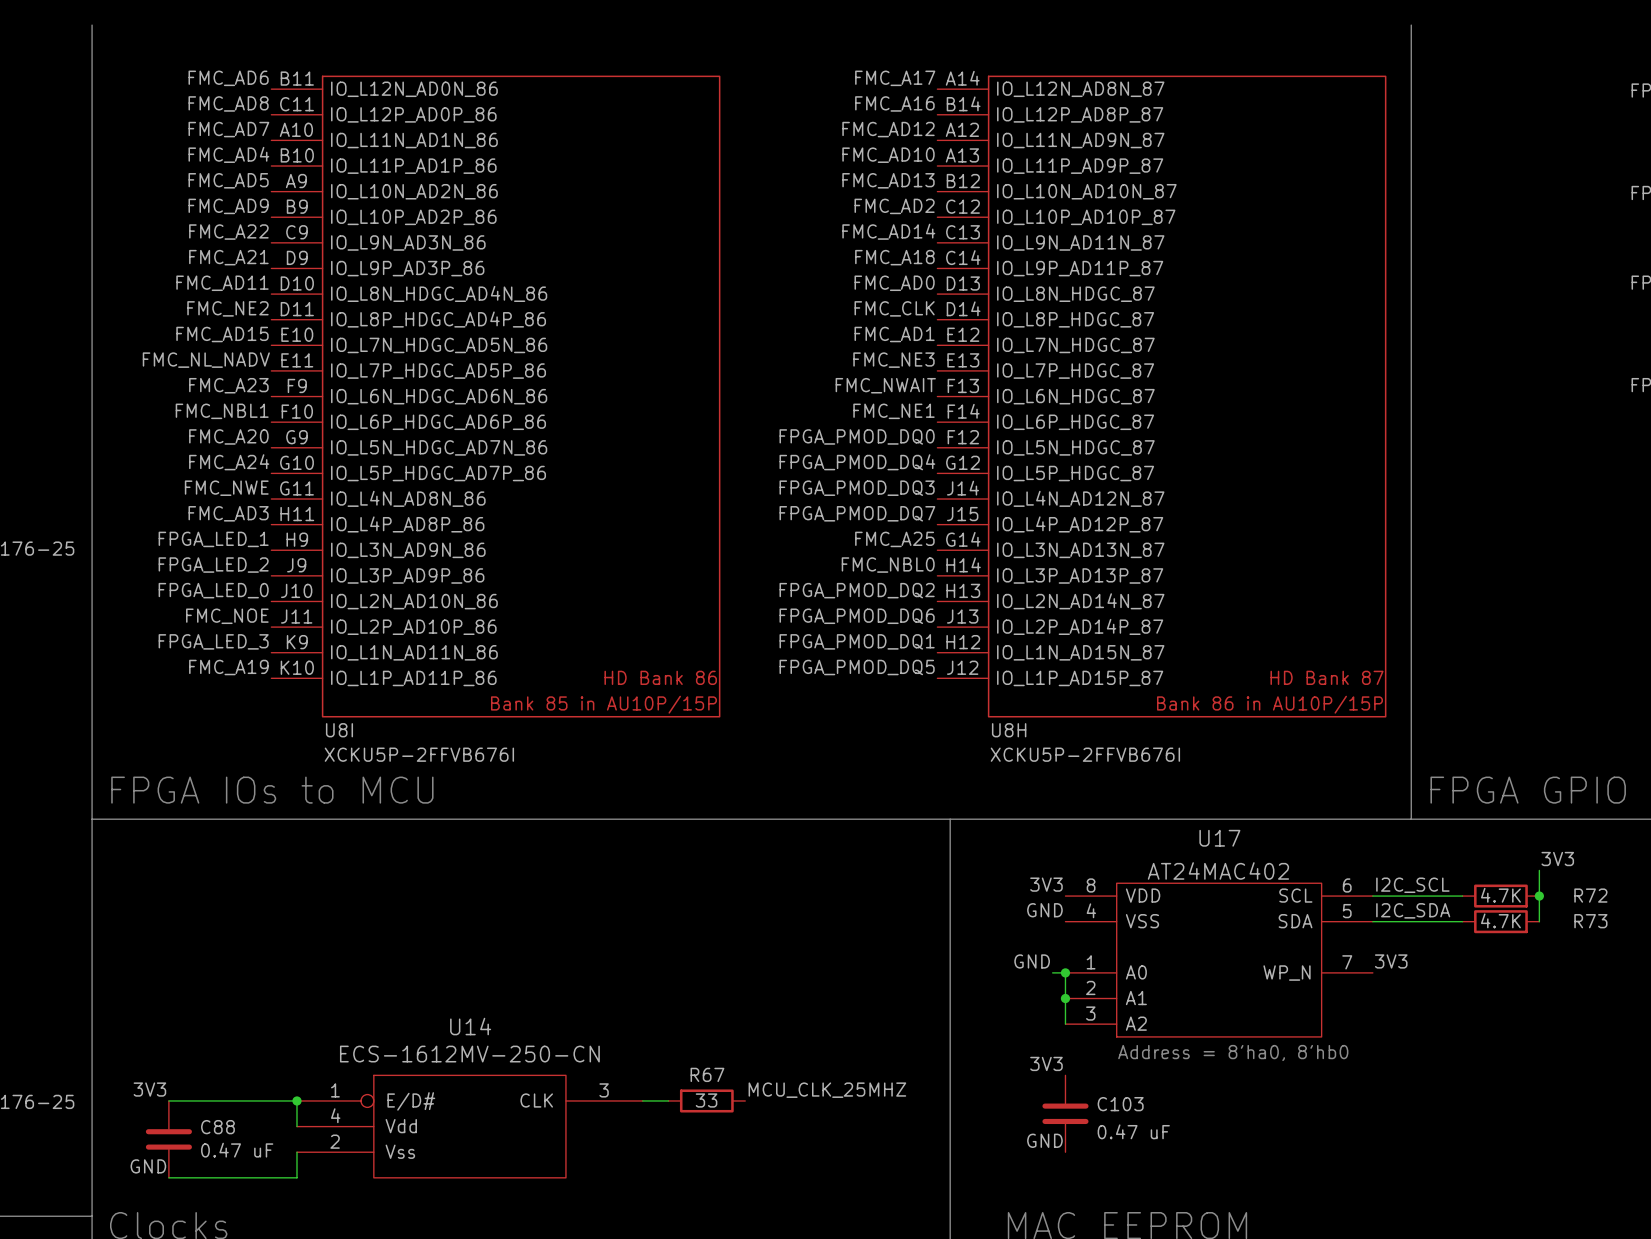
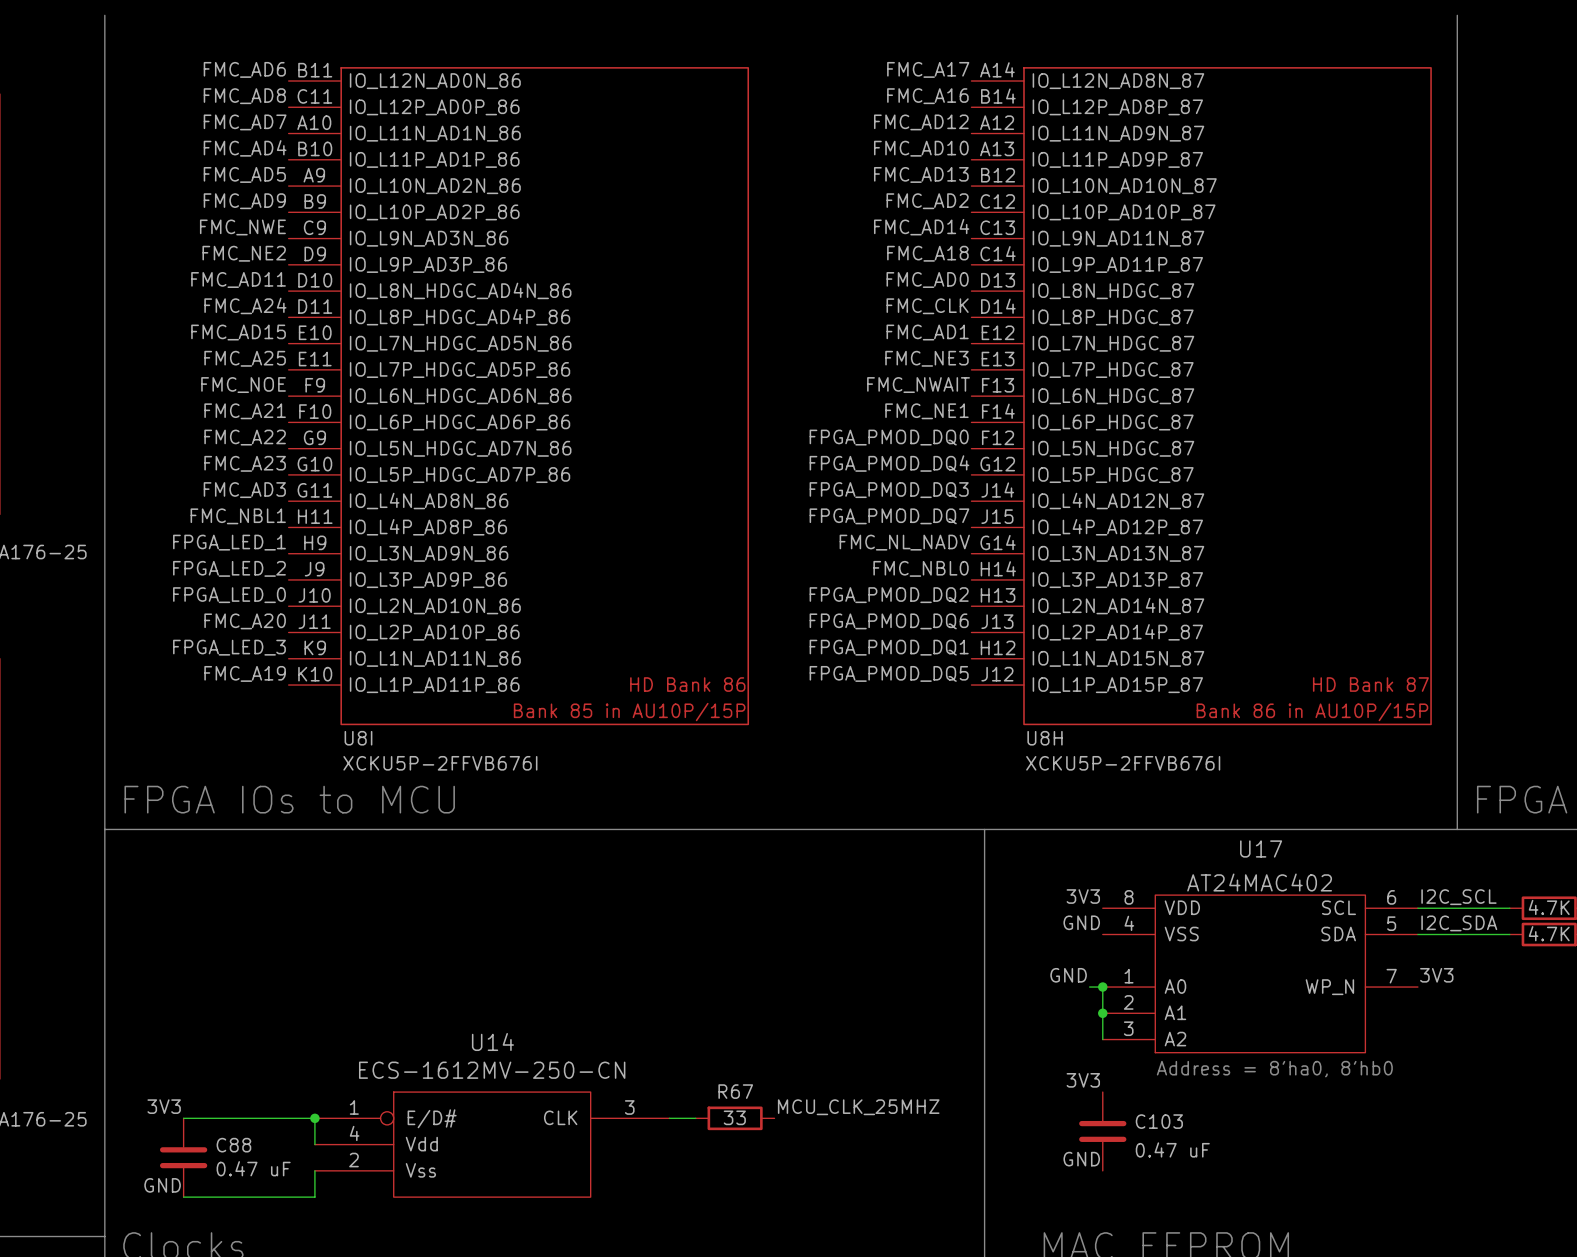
label: FMC_A22 (228, 232) -> FMC_NWE (242, 227)
label: FMC_A21 (228, 257) -> FMC_NE2 (244, 253)
label: FMC_NE2 (227, 308) -> FMC_A24 (245, 305)
label: FMC_NL_NADV (206, 360) -> FMC_A25 (245, 358)
label: FMC_A23 (228, 385) -> FMC_NOE (243, 385)
label: FMC_NBL1 (222, 411) -> FMC_A21 (245, 411)
label: FMC_A20 (228, 436) -> FMC_A22 (245, 437)
label: FMC_A24 (229, 462) -> FMC_A23 (245, 463)
label: FMC_NWE (226, 488) -> FMC_AD3 (244, 490)
label: FMC_AD3 (228, 513) -> FMC_NBL1 (238, 516)
label: FMC_A25 (894, 539) -> FMC_NL_NADV (904, 542)
label: FMC_NOE (227, 616) -> FMC_A20 (245, 621)

